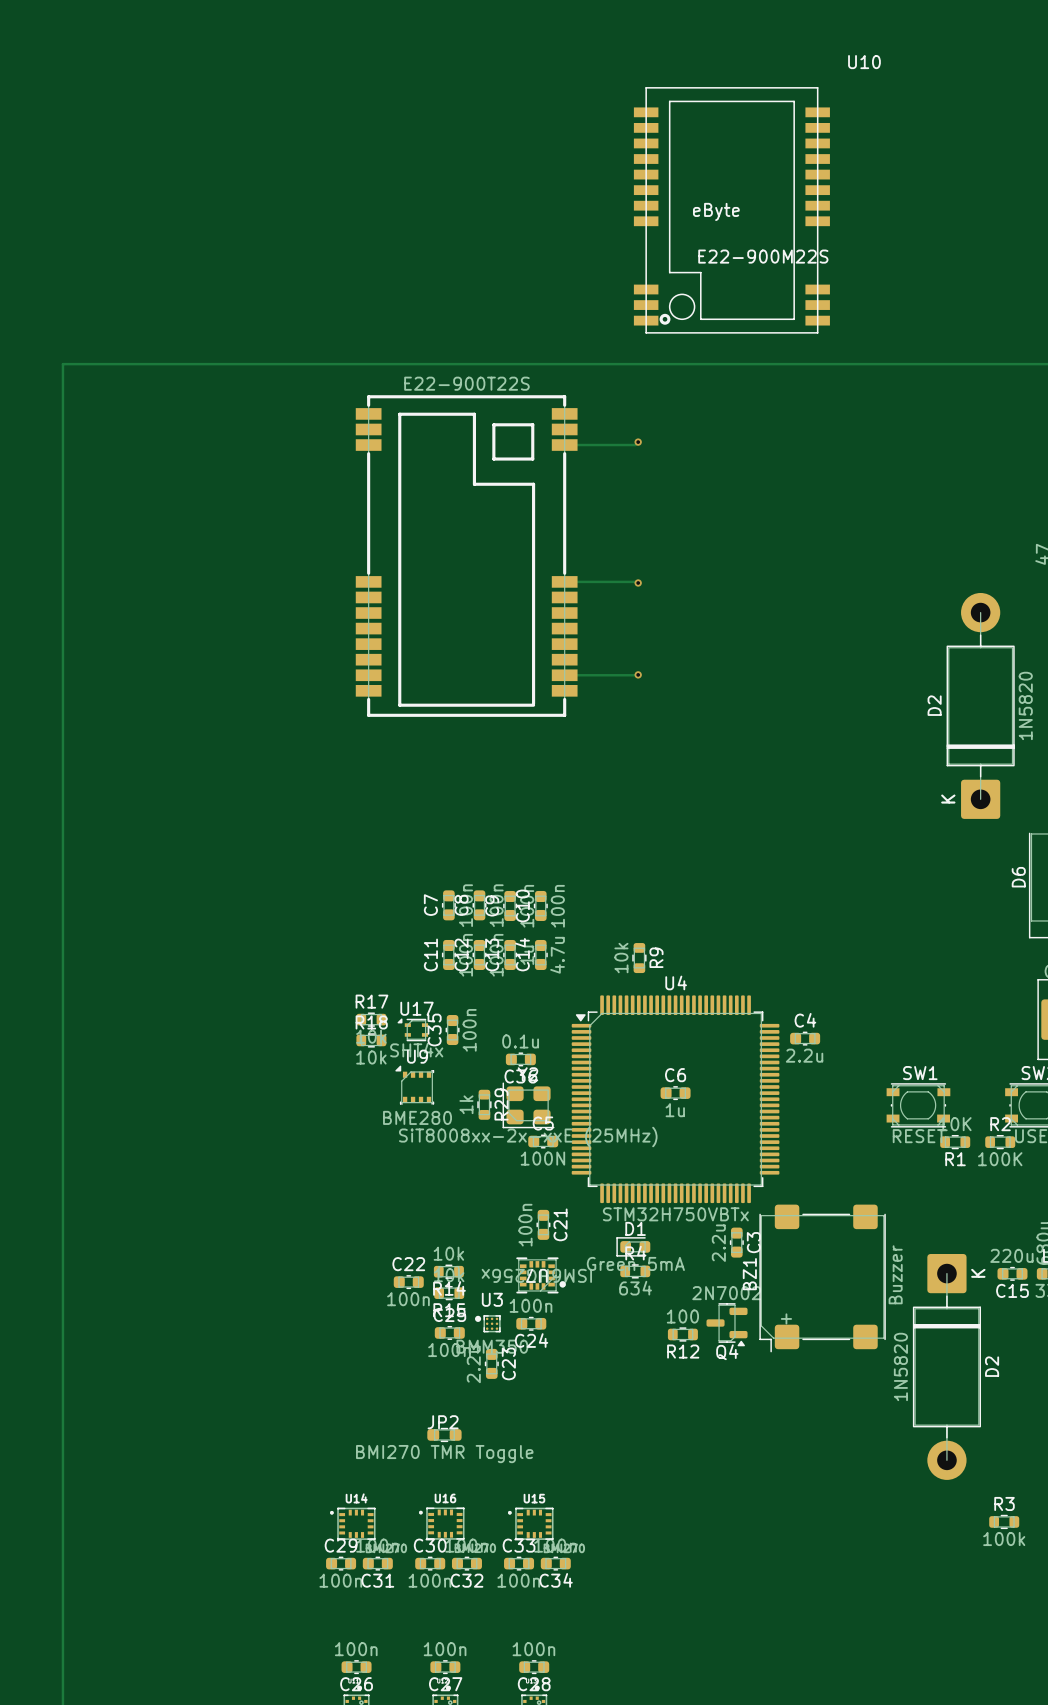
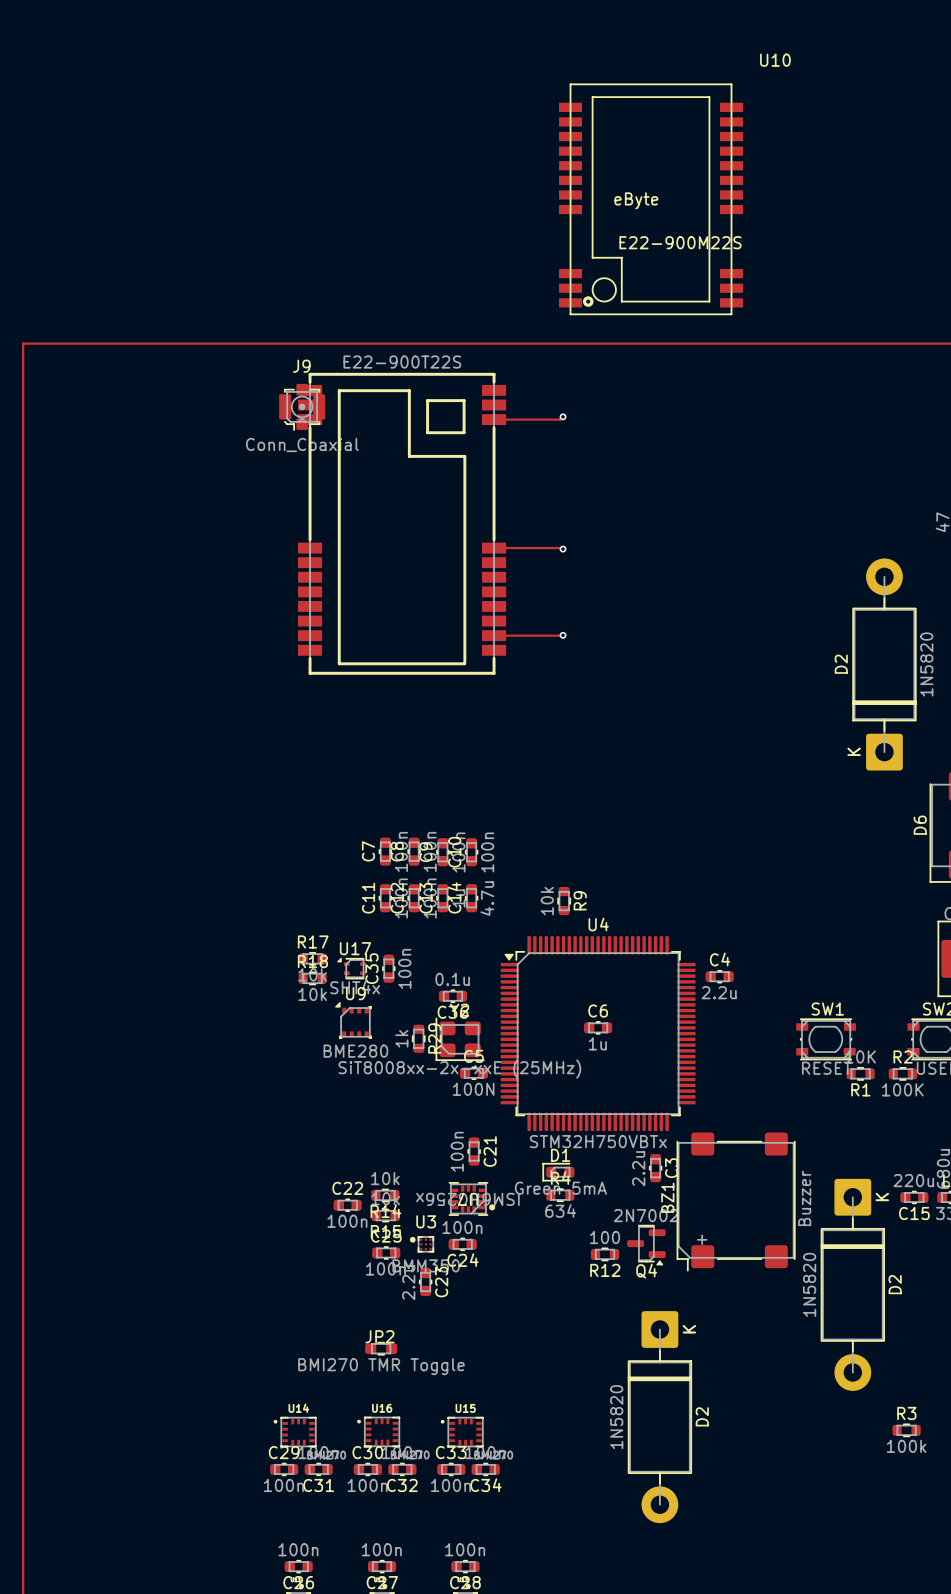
J9: none -> Conn_Coaxial (302, 407)
D2: none -> 1N5820 (659, 1417)

